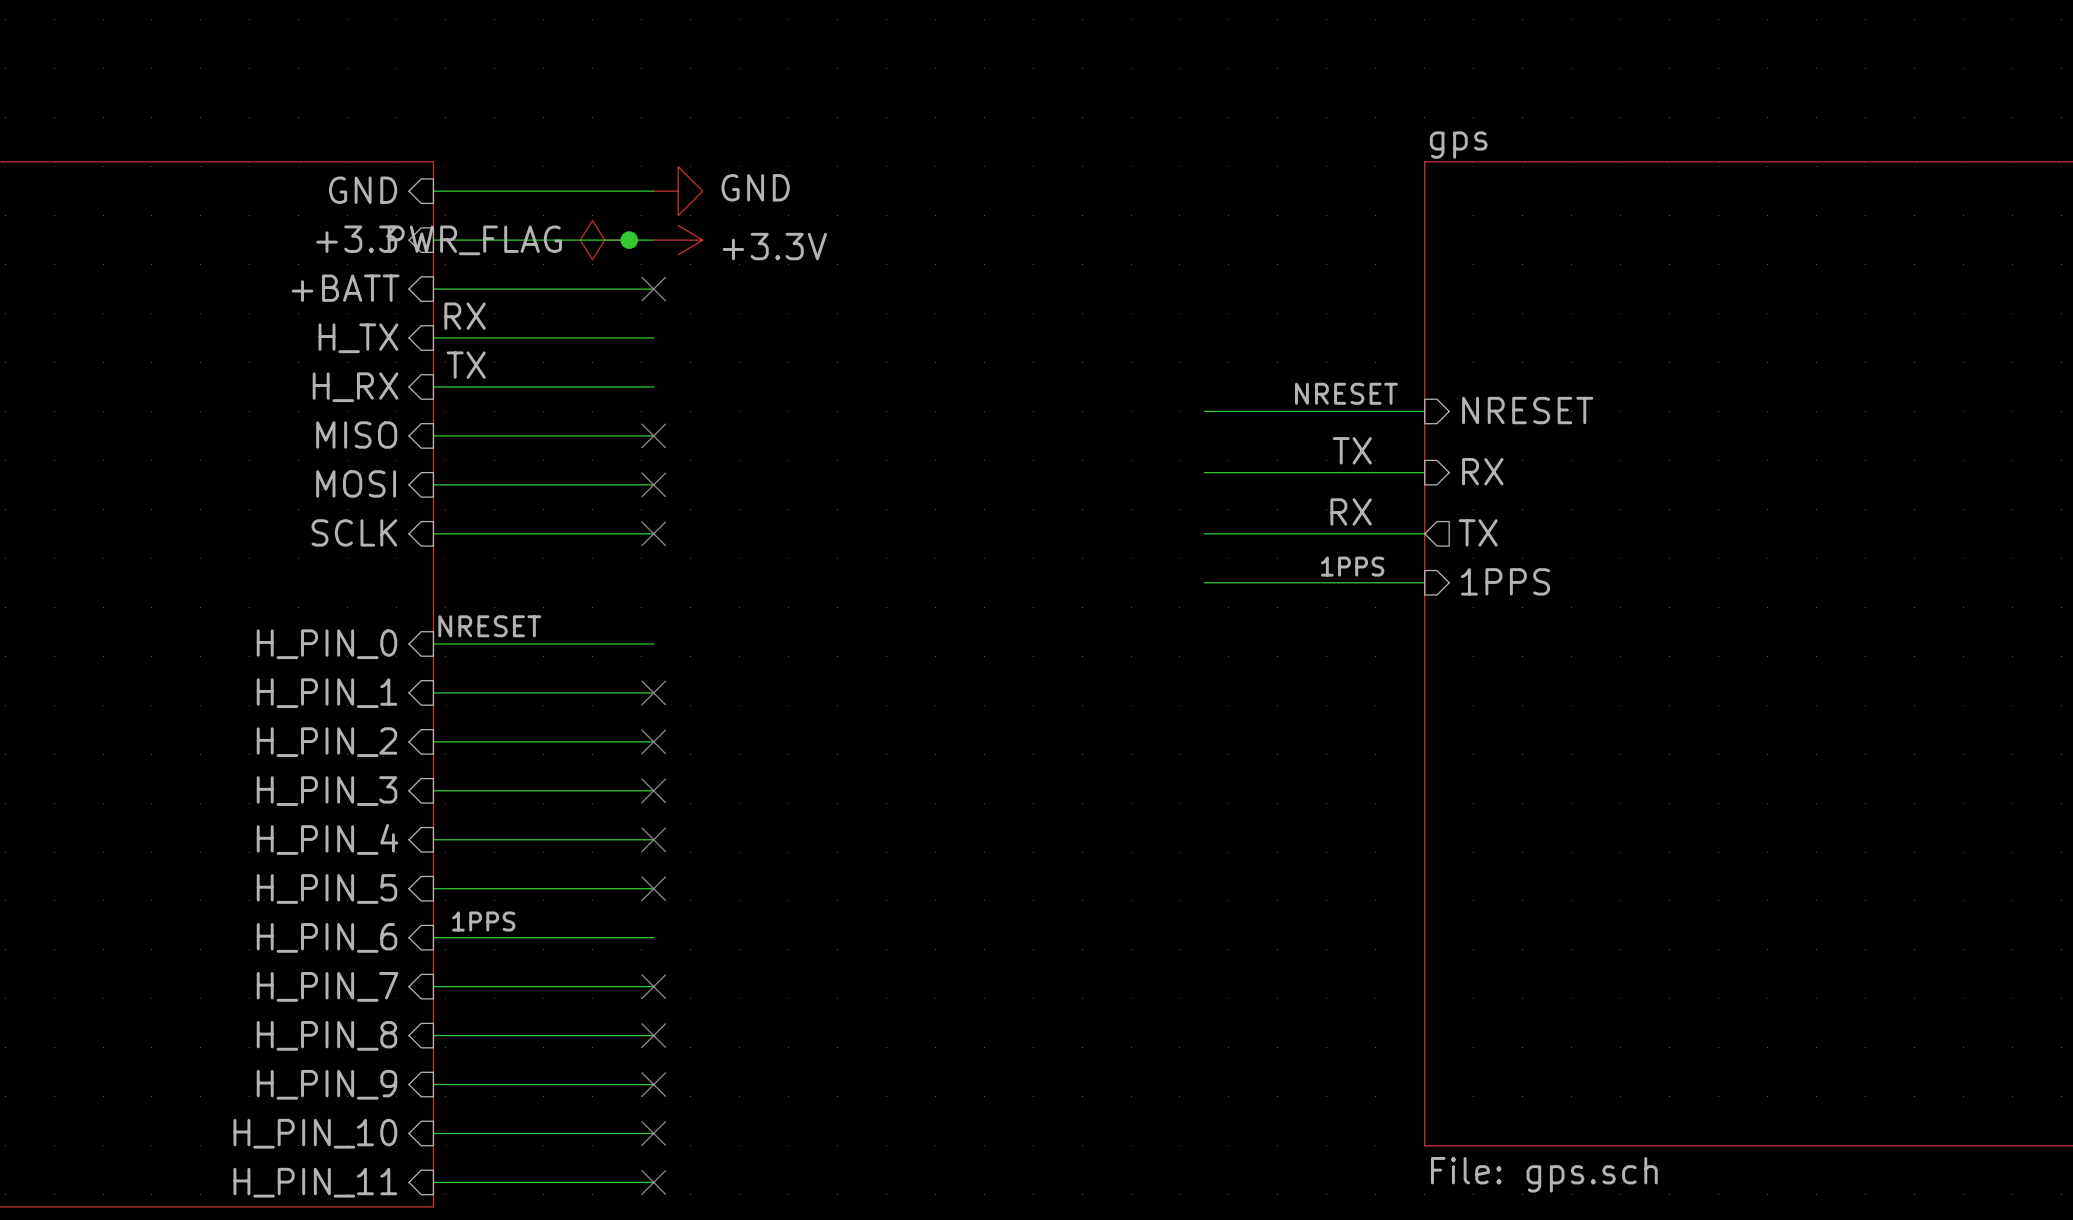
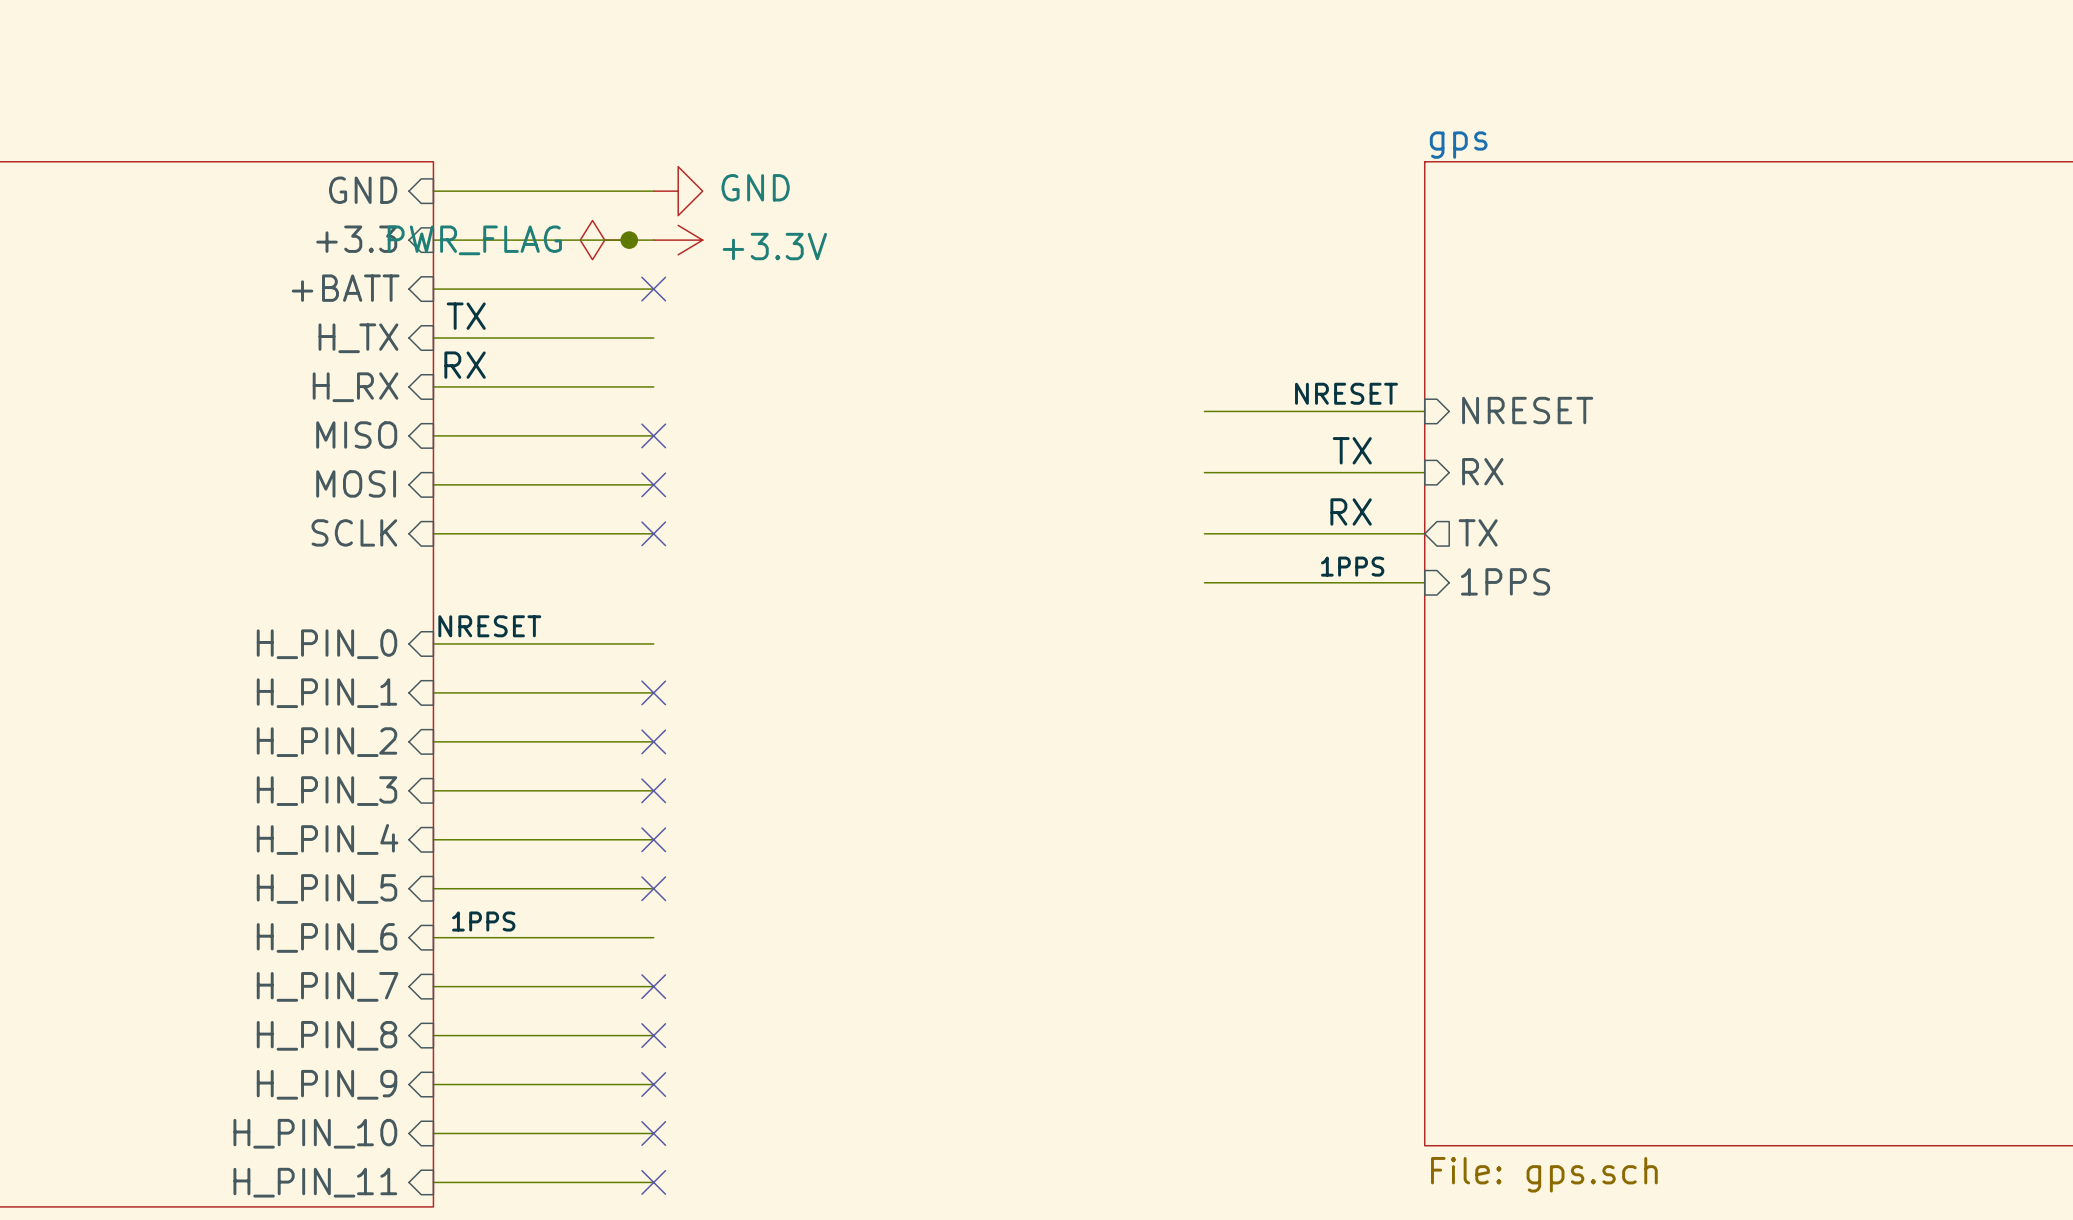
label: RX (465, 316) -> TX (466, 316)
label: TX (466, 365) -> RX (465, 365)

